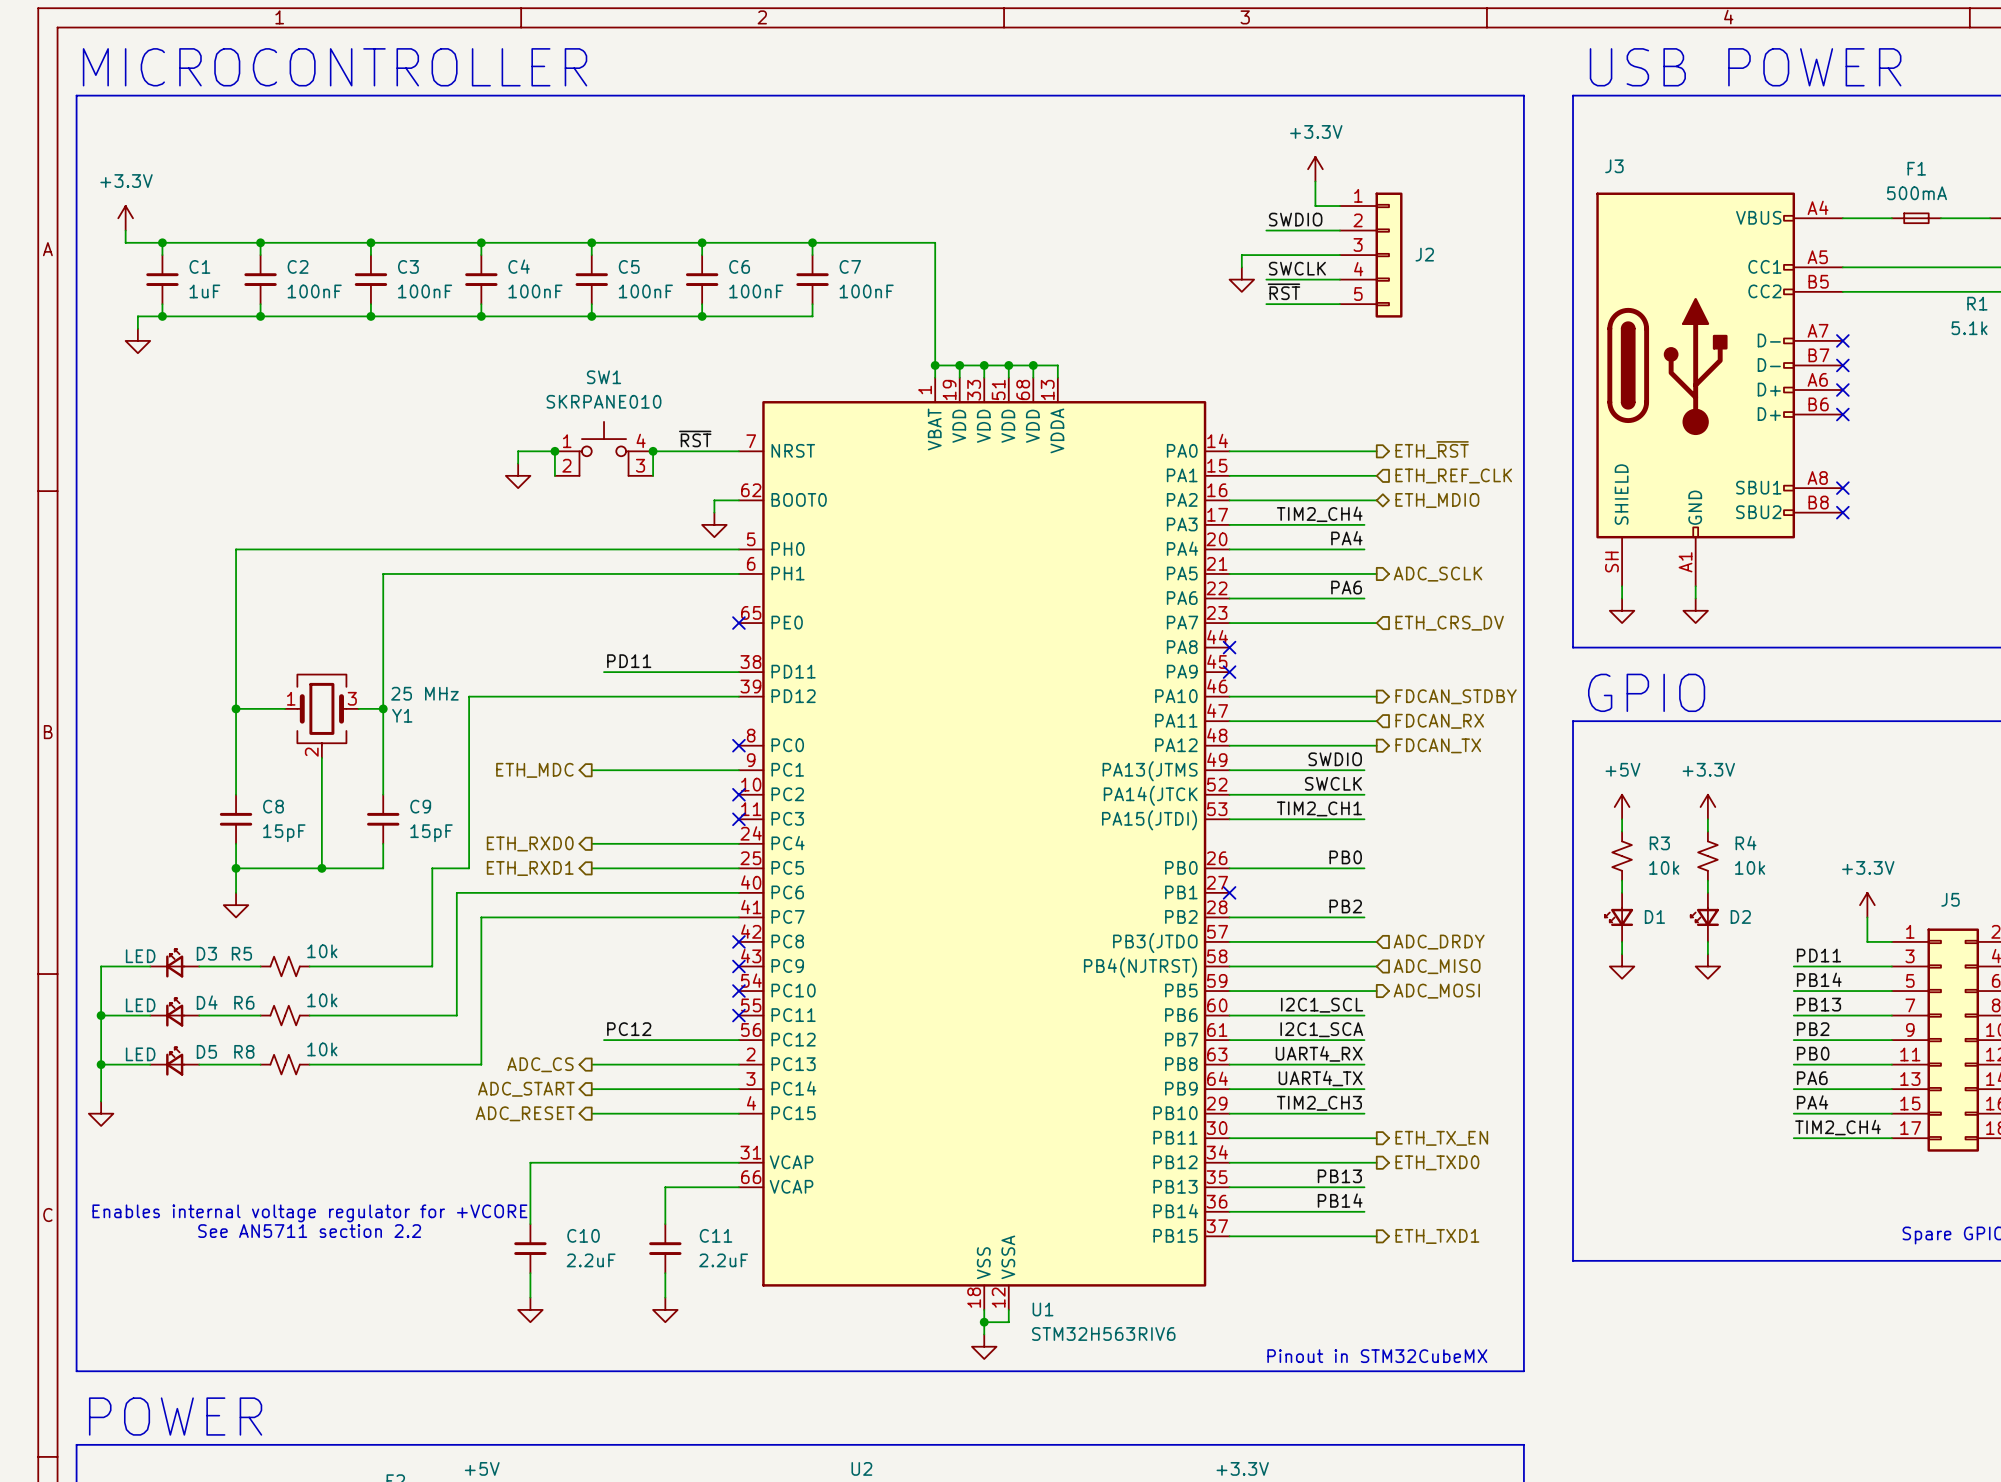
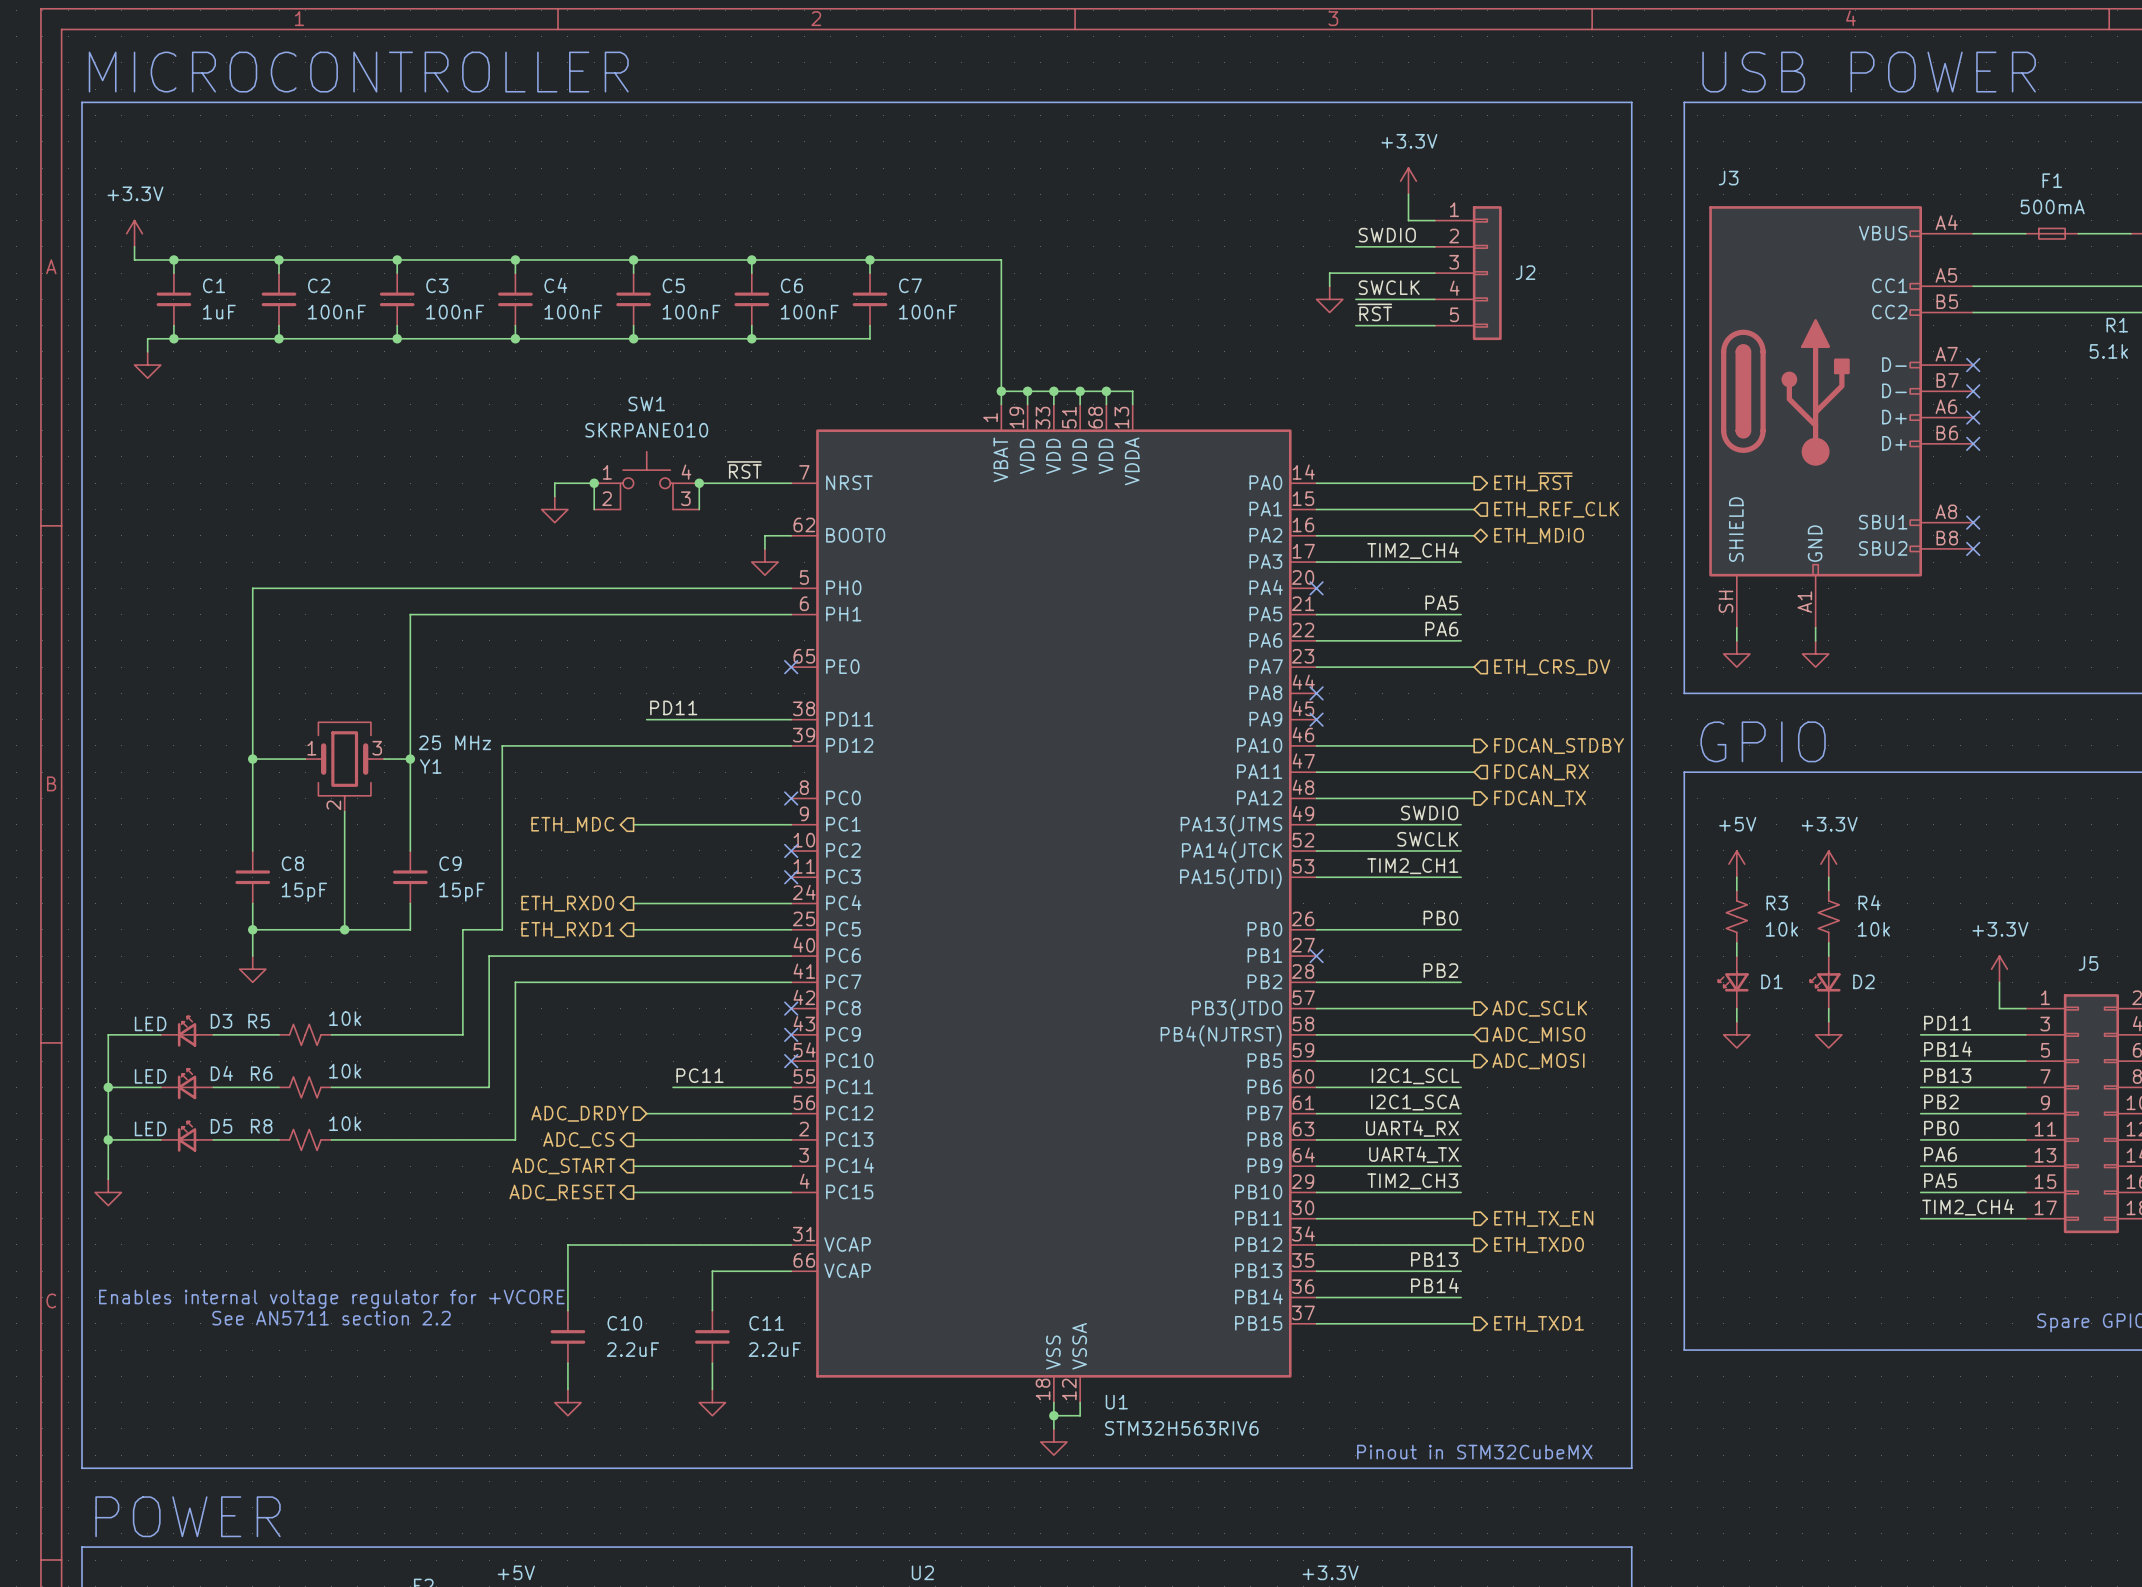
label: PA4 (1346, 538) -> PA5 (1441, 602)
wire: (1229, 549) (1364, 549) -> none
no-connect mark: none -> (1316, 588)
wire: (1364, 573) (1376, 573) -> none
hierarchical label: ADC_SCLK (1437, 574) -> none
hierarchical label shape: input (1439, 942) -> output (1539, 1008)
hierarchical label: ADC_DRDY (1439, 942) -> ADC_SCLK (1539, 1008)
wire: none -> (673, 1087) (791, 1087)
no-connect mark: (738, 1015) -> none
label: PC12 (629, 1029) -> PC11 (700, 1075)
hierarchical label: none -> ADC_DRDY (579, 1113)
label: PA4 (1812, 1102) -> PA5 (1940, 1180)

